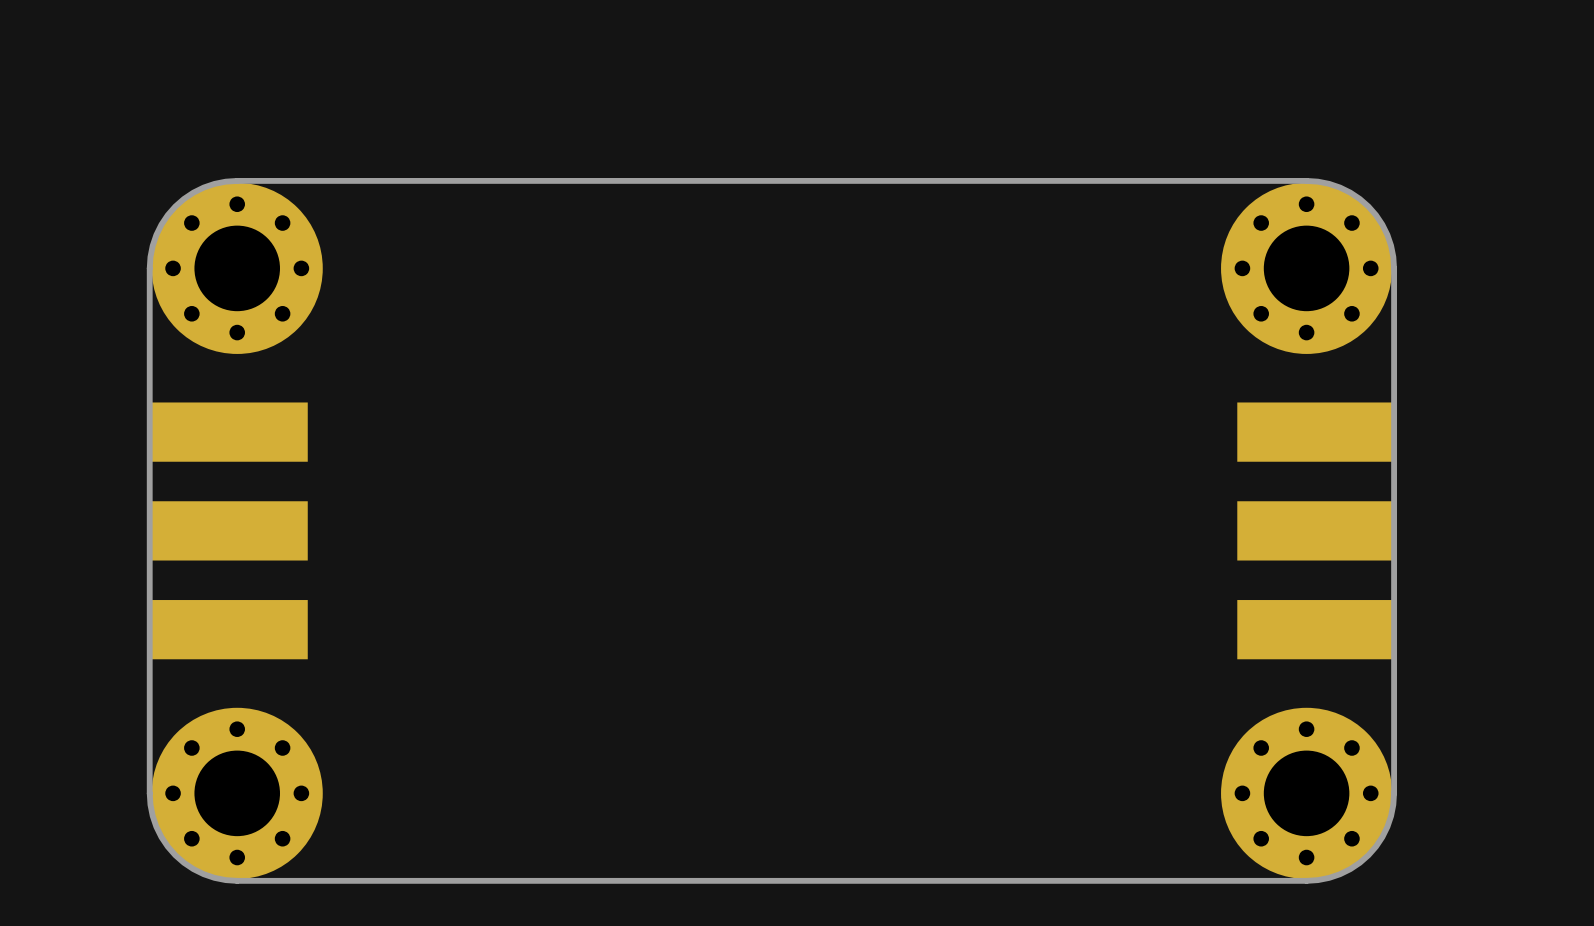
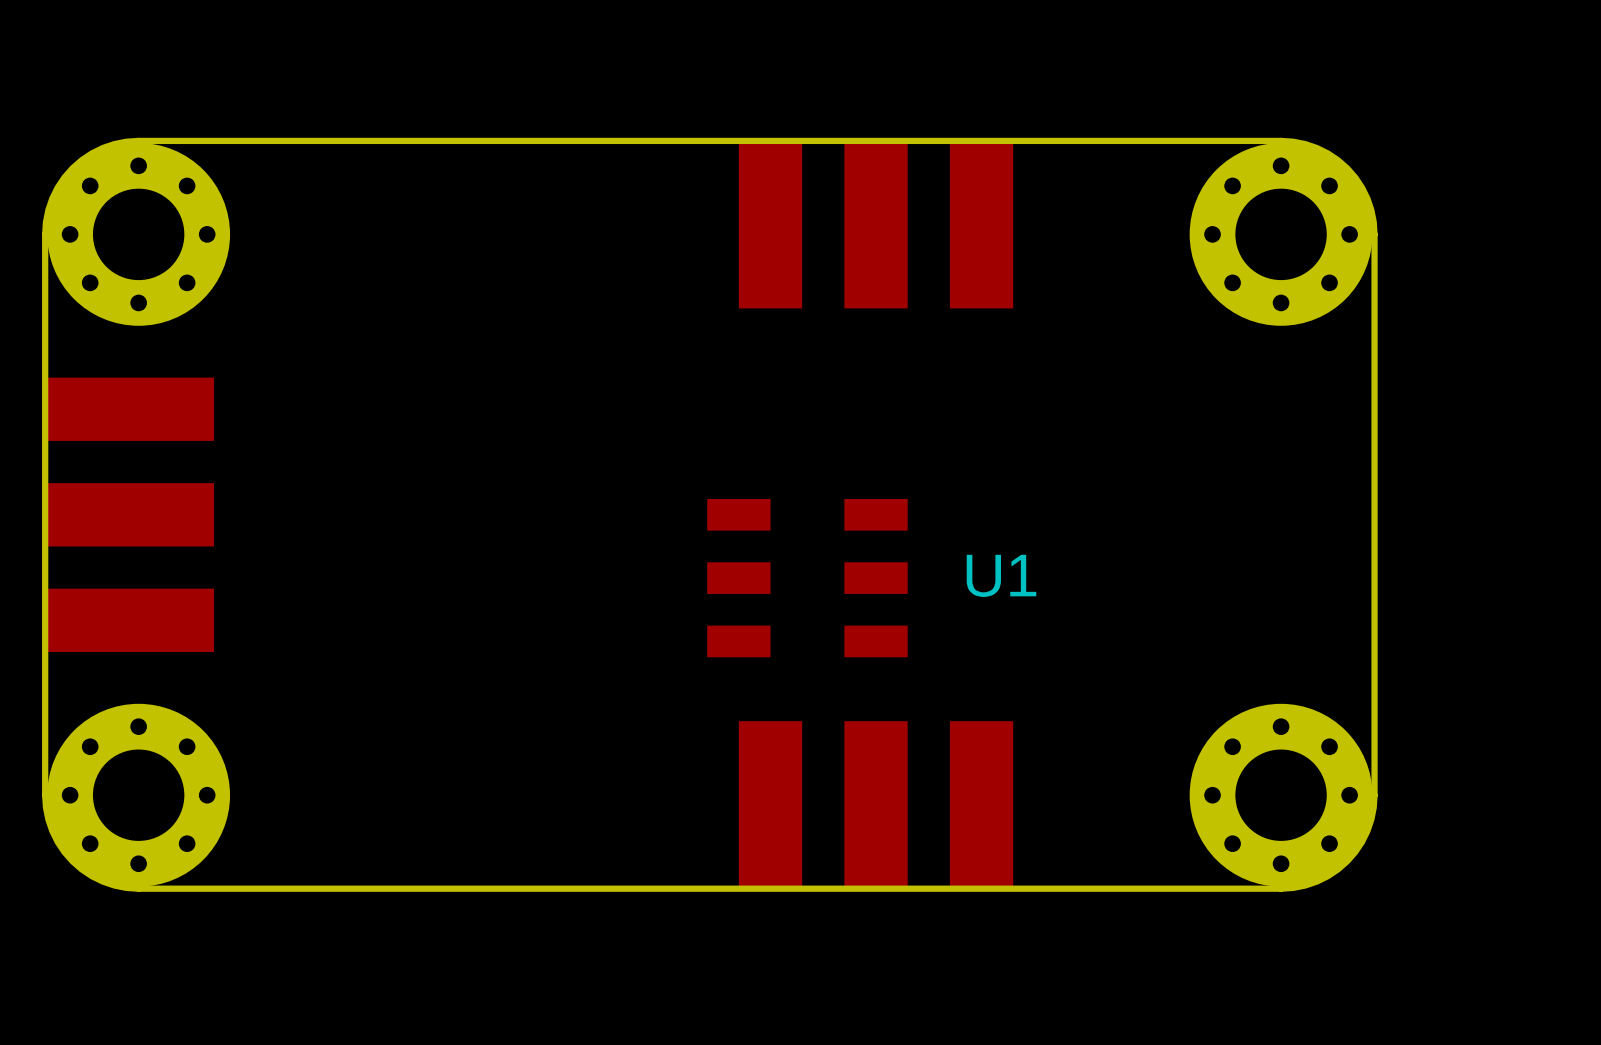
part: none -> (876, 224)
part: (1316, 530) -> none
U1: none -> (807, 578)
part: none -> (876, 805)

